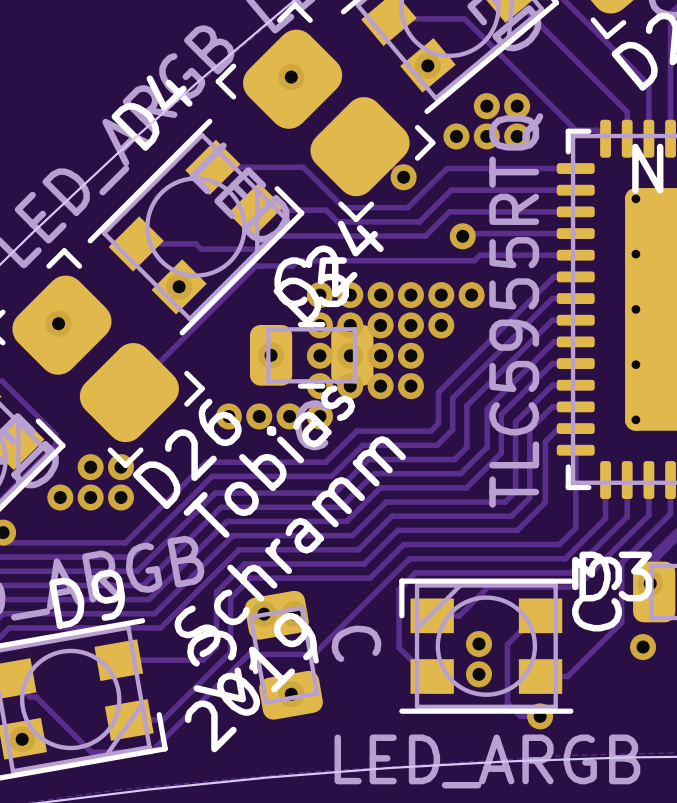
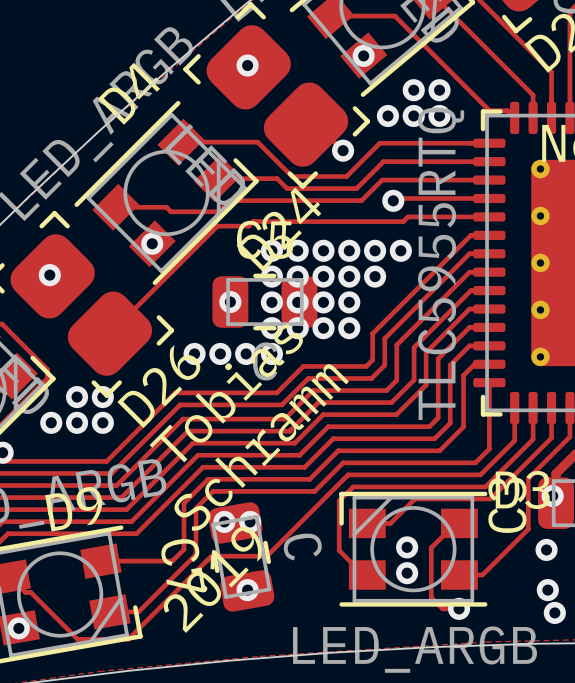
via: none -> (547, 590)
via: none -> (554, 612)

